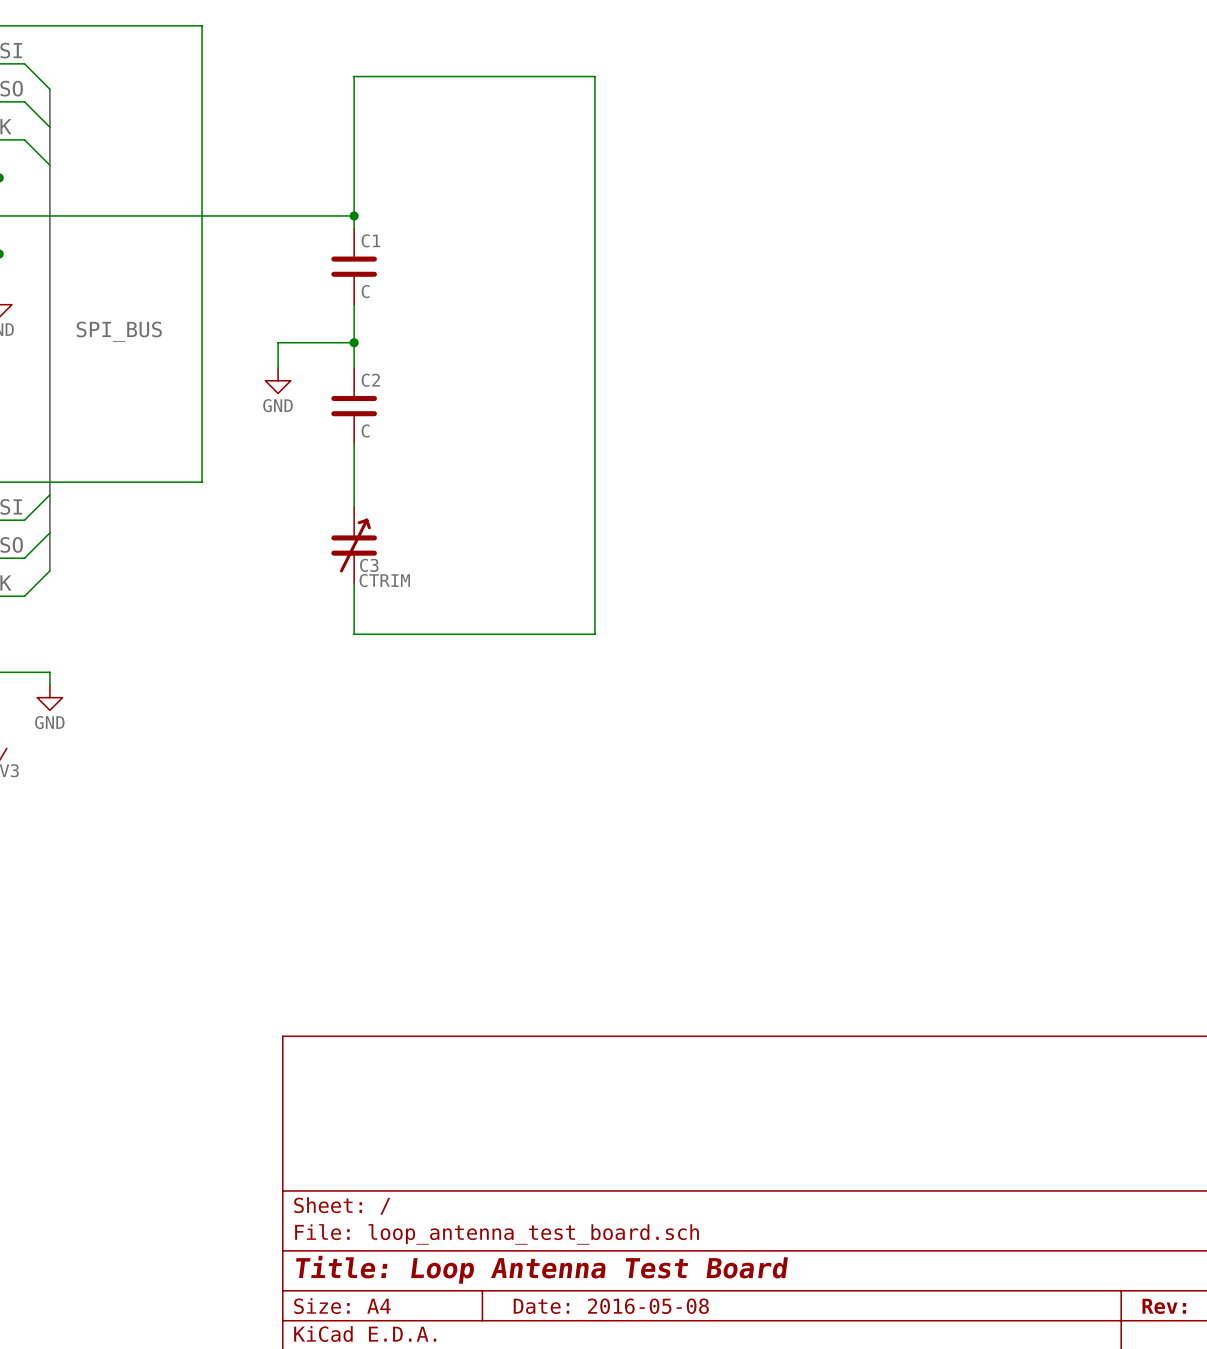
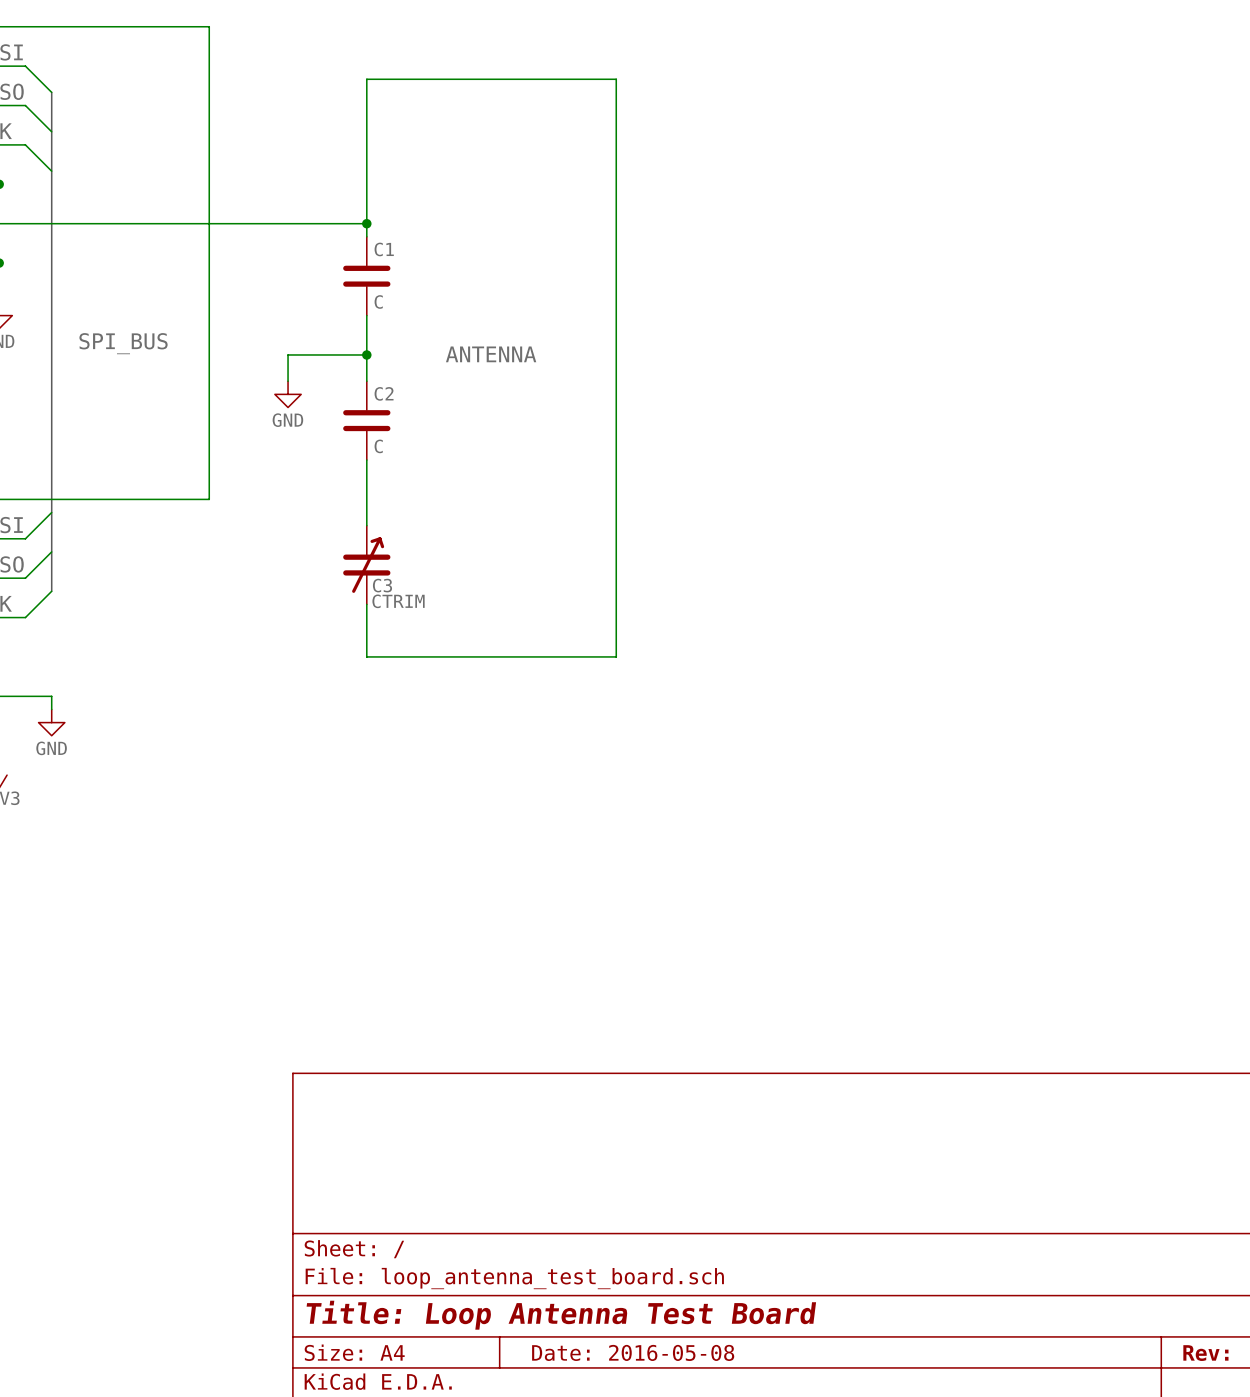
label: none -> ANTENNA (491, 354)

